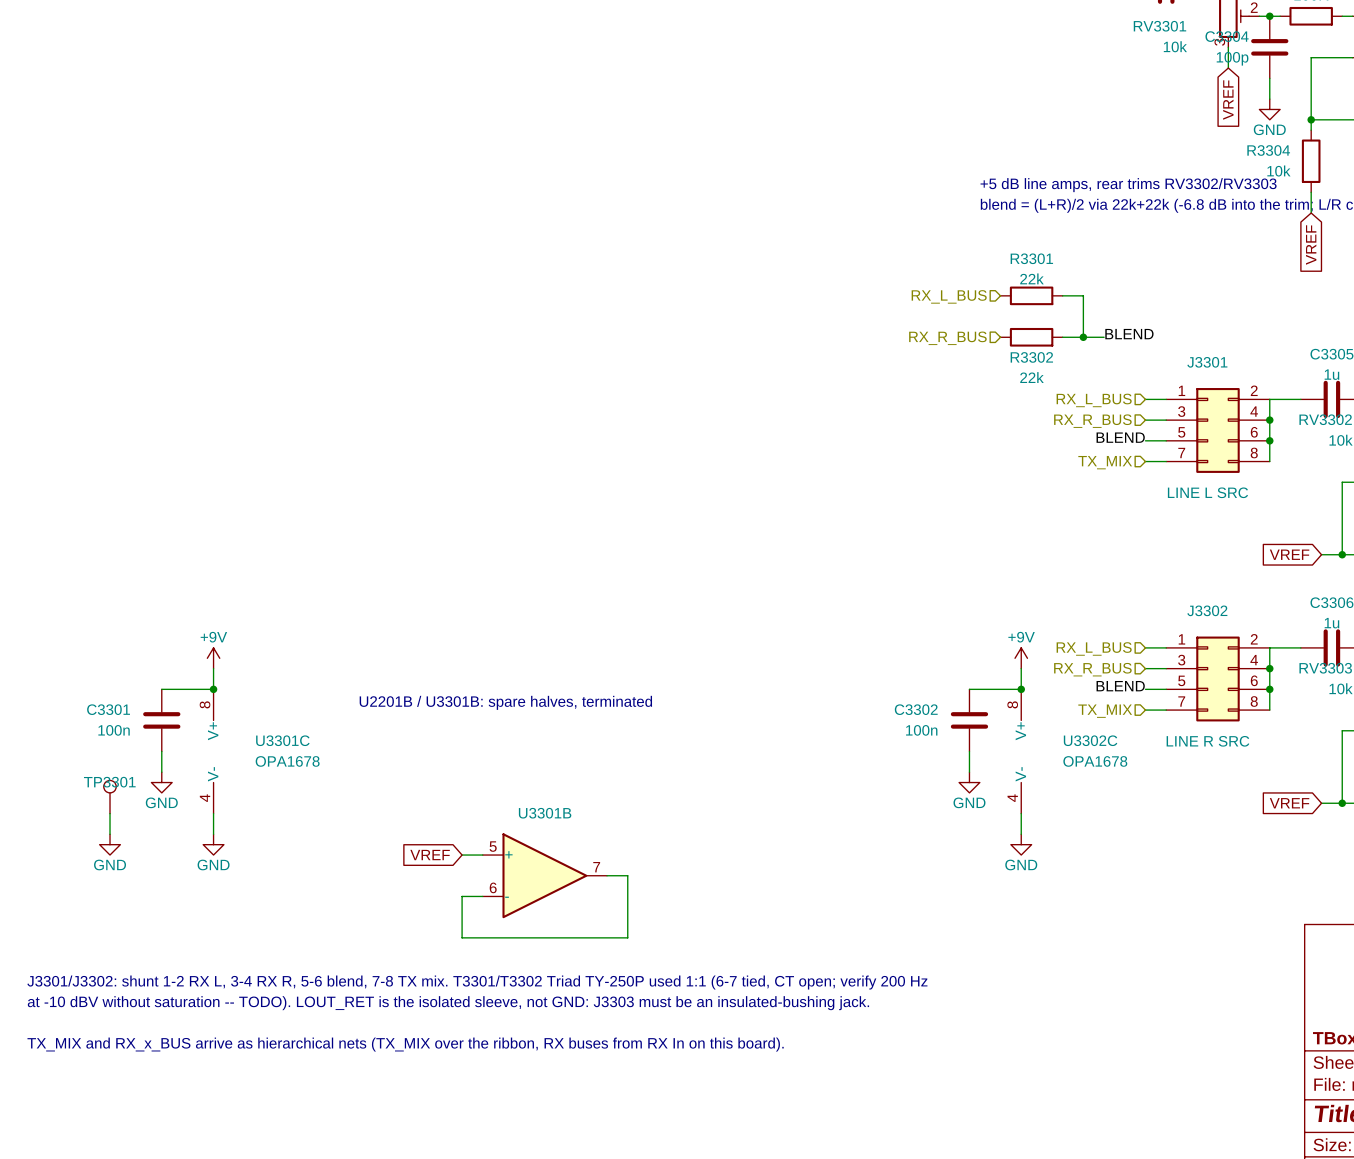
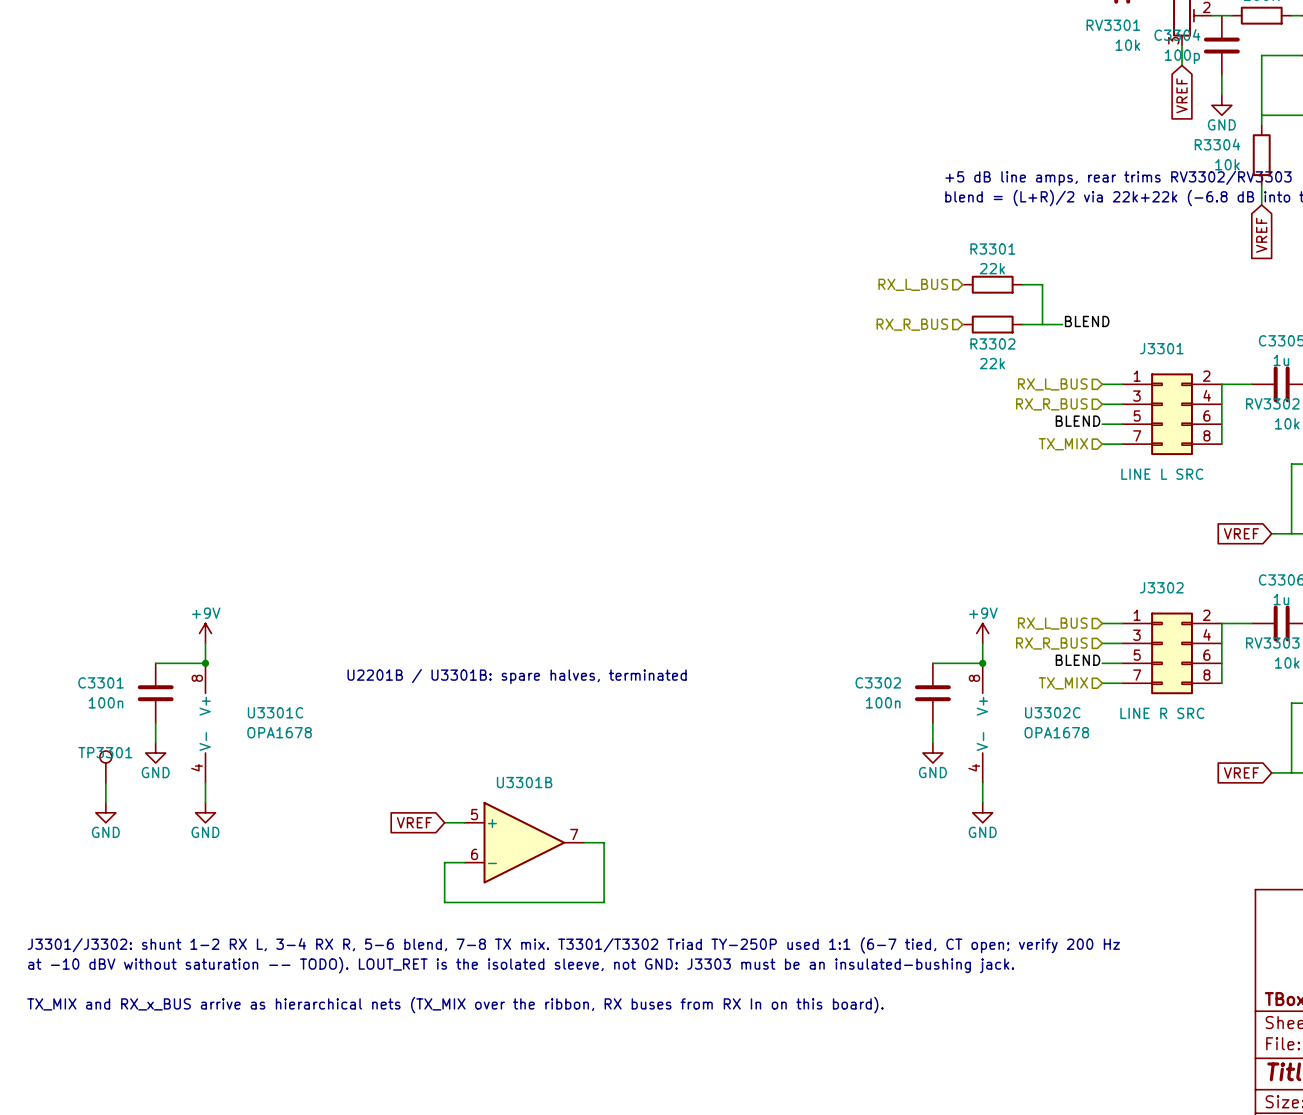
junction: (1269, 16) -> none
junction: (1311, 119) -> none
junction: (1083, 337) -> none
junction: (1269, 420) -> none
junction: (1269, 440) -> none
junction: (1342, 554) -> none
junction: (1269, 668) -> none
junction: (1269, 689) -> none
junction: (1342, 803) -> none

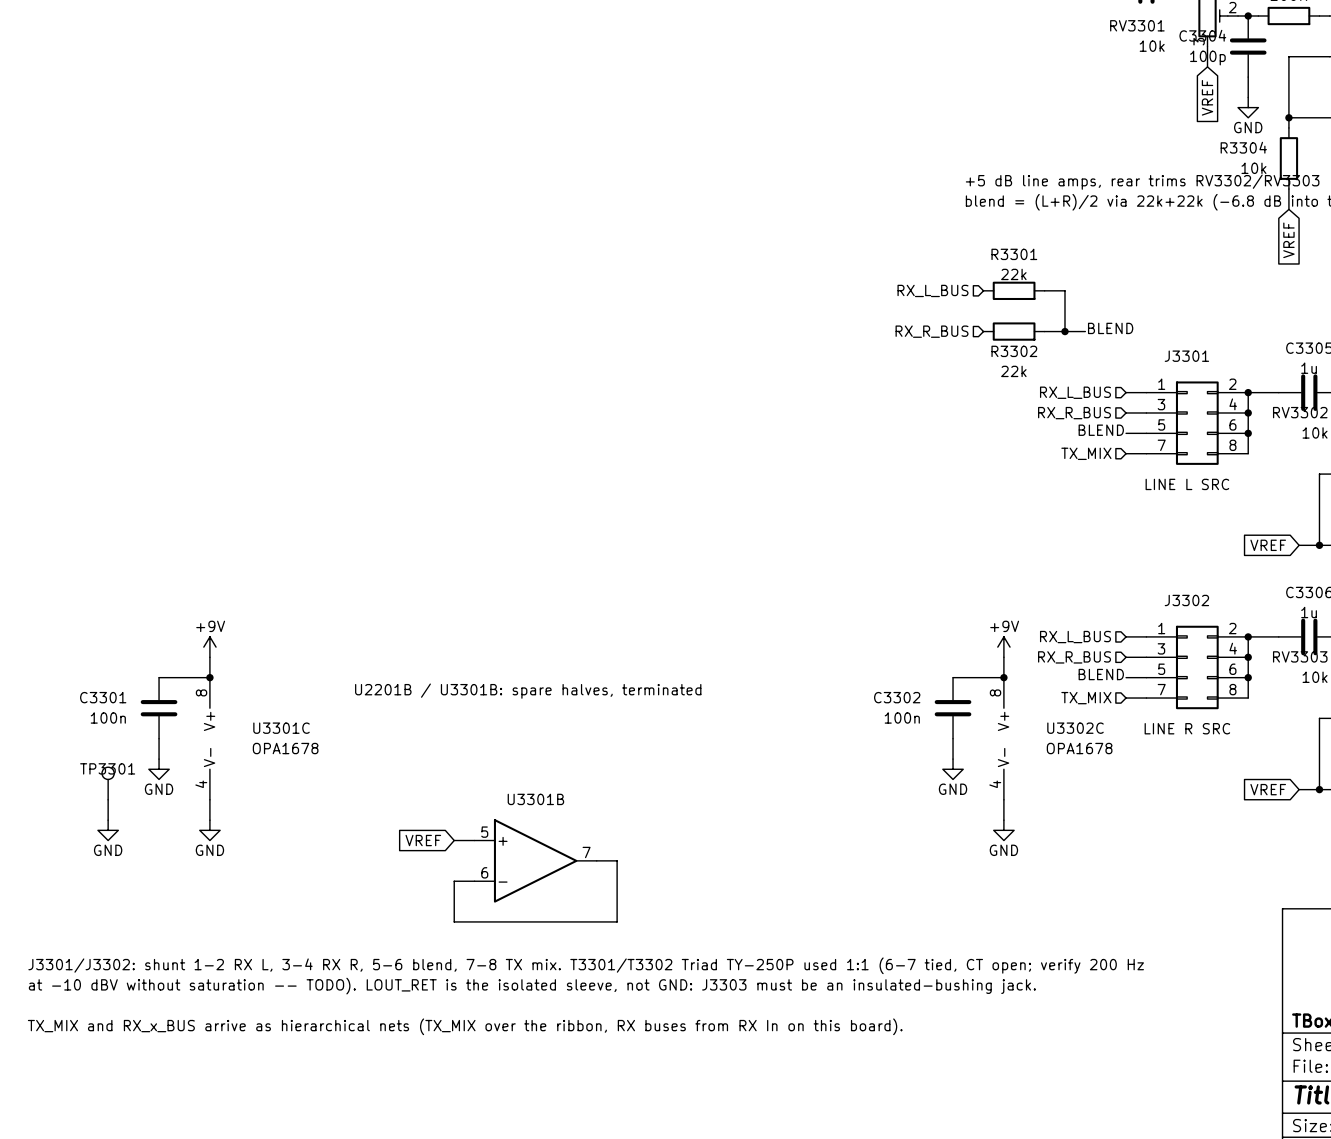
junction: none -> (1248, 15)
junction: none -> (1288, 117)
junction: none -> (1064, 331)
junction: none -> (1248, 392)
junction: none -> (1248, 412)
junction: none -> (1248, 433)
junction: none -> (1319, 545)
junction: none -> (1248, 636)
junction: none -> (1248, 657)
junction: none -> (1248, 677)
junction: none -> (1319, 789)

